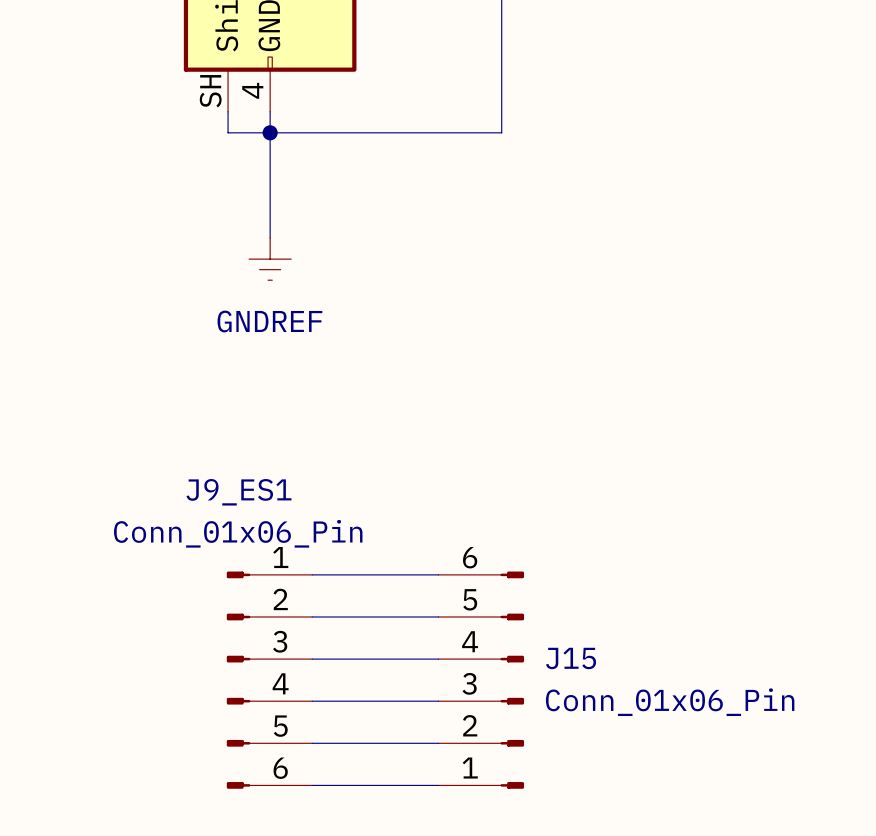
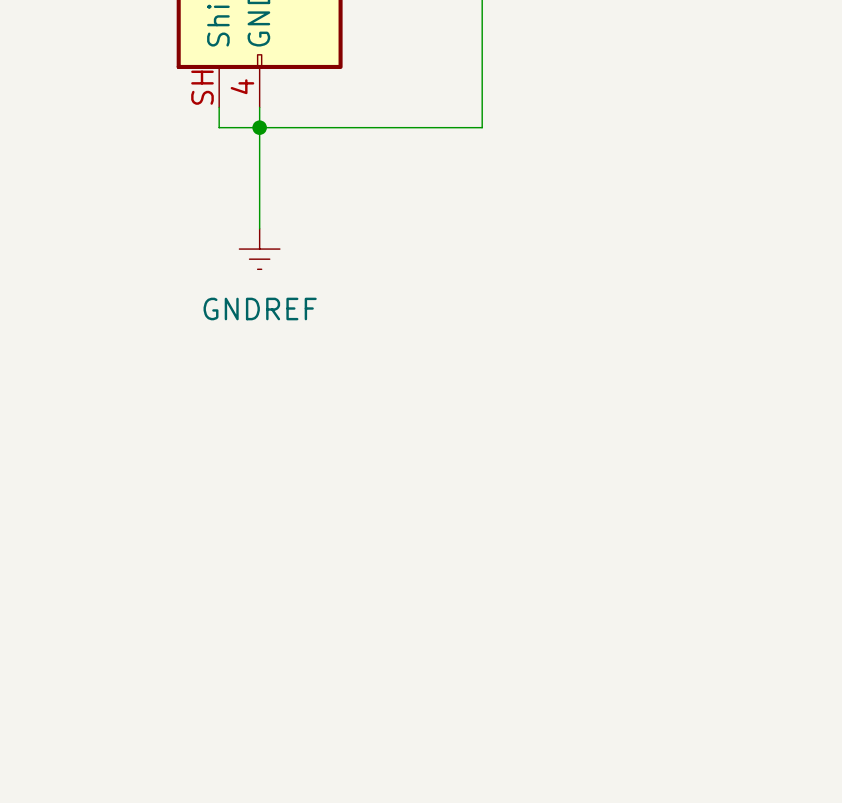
wire: (312, 574) (438, 574) -> none
wire: (312, 616) (438, 616) -> none
wire: (312, 659) (438, 659) -> none
J9_ES1: Conn_01x06_Pin (269, 680) -> none
J15: Conn_01x06_Pin (481, 680) -> none
wire: (312, 701) (438, 701) -> none
wire: (312, 743) (438, 743) -> none
wire: (312, 785) (438, 785) -> none

